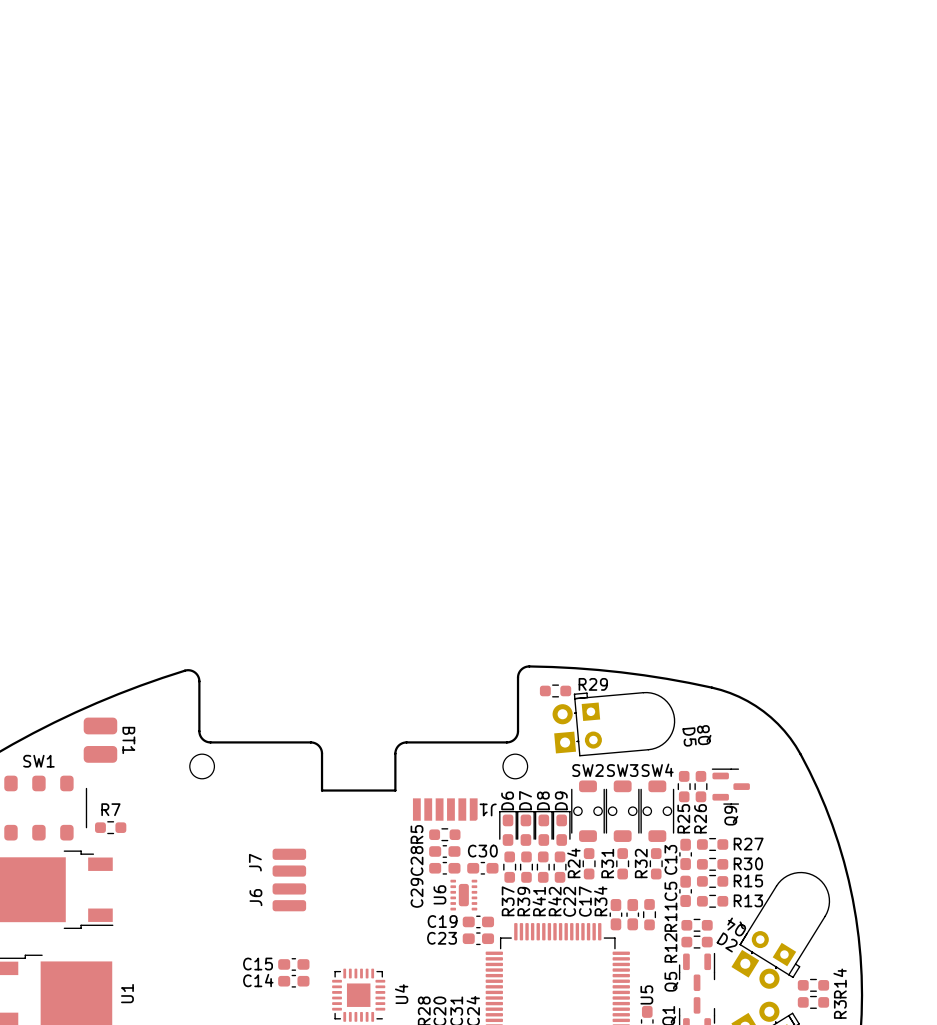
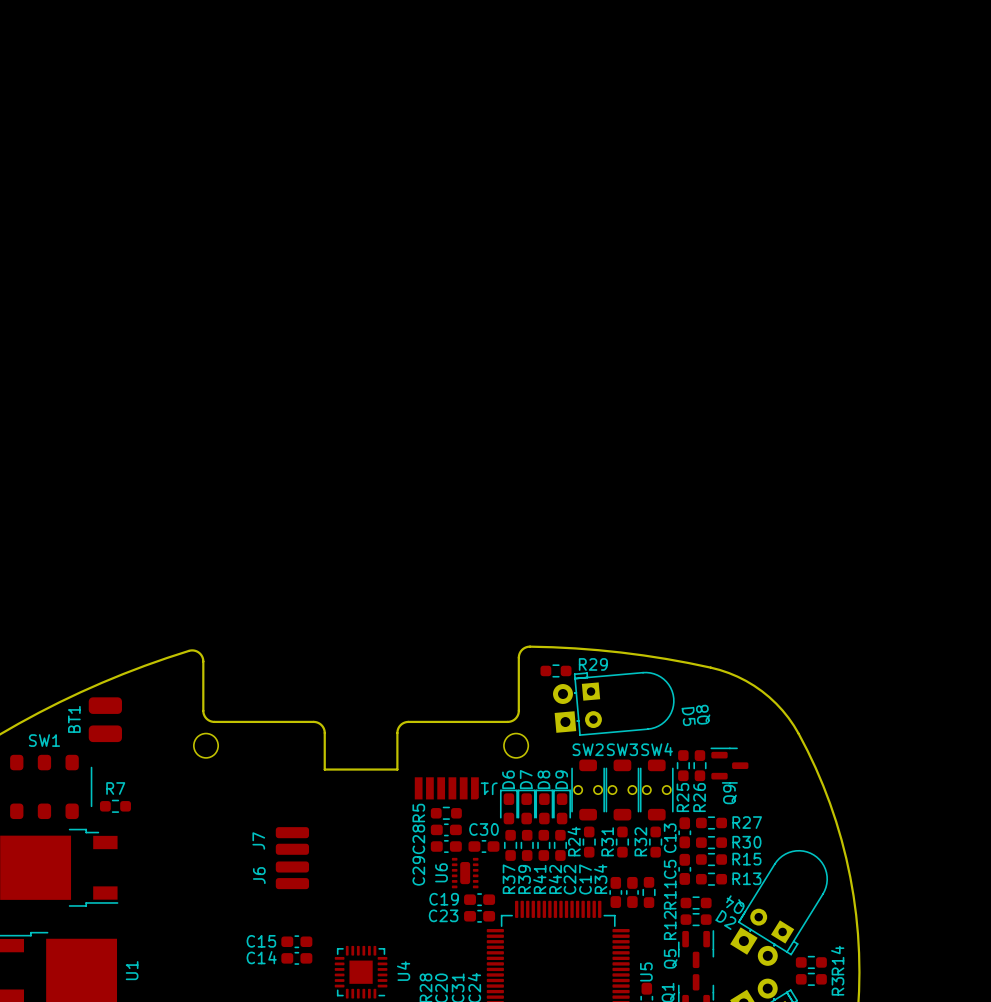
BT1 name rotation: 0° (128, 740) -> 180° (74, 719)
BT1 name position: BT1 (128, 740) -> BT1 (74, 719)

